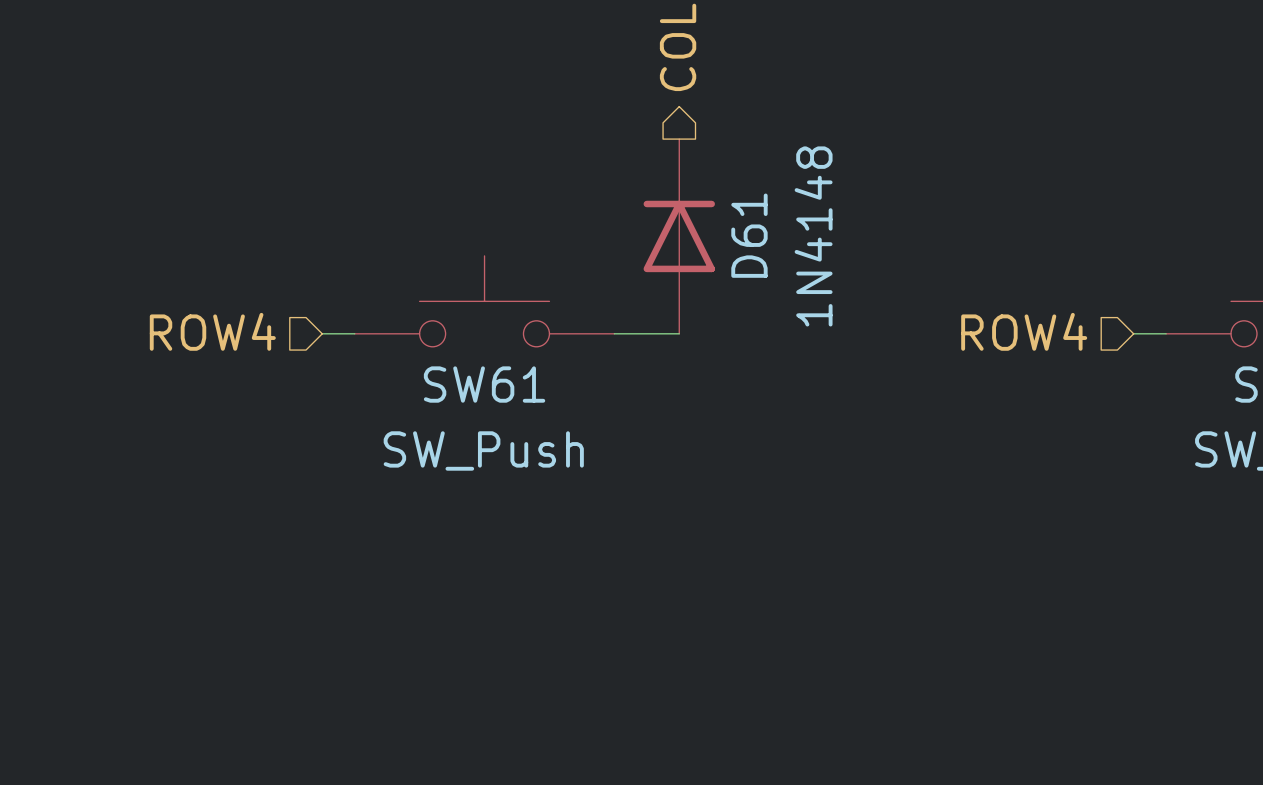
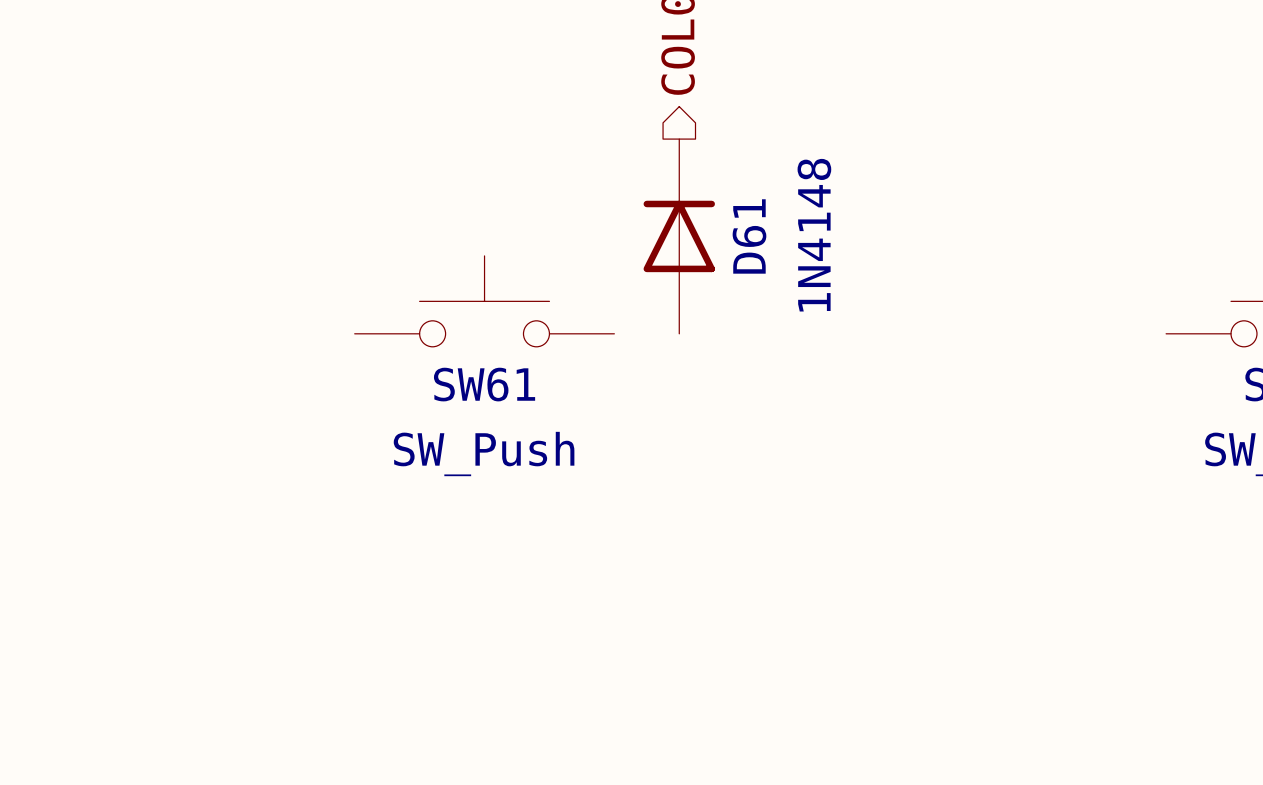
hierarchical label: ROW4 (212, 331) -> none
hierarchical label: ROW4 (1024, 331) -> none
wire: (322, 333) (354, 333) -> none
wire: (614, 333) (679, 333) -> none
wire: (1133, 333) (1166, 333) -> none

